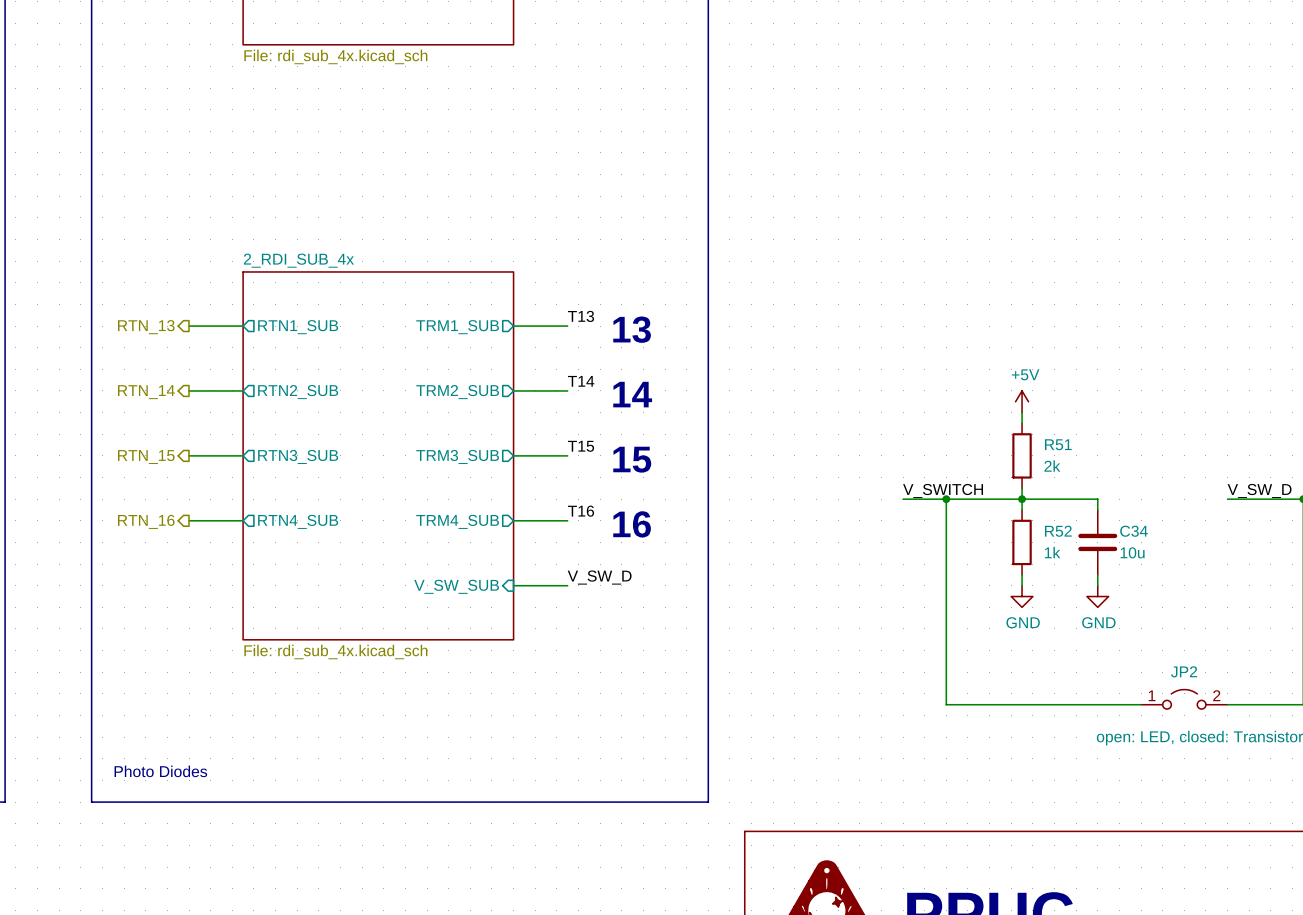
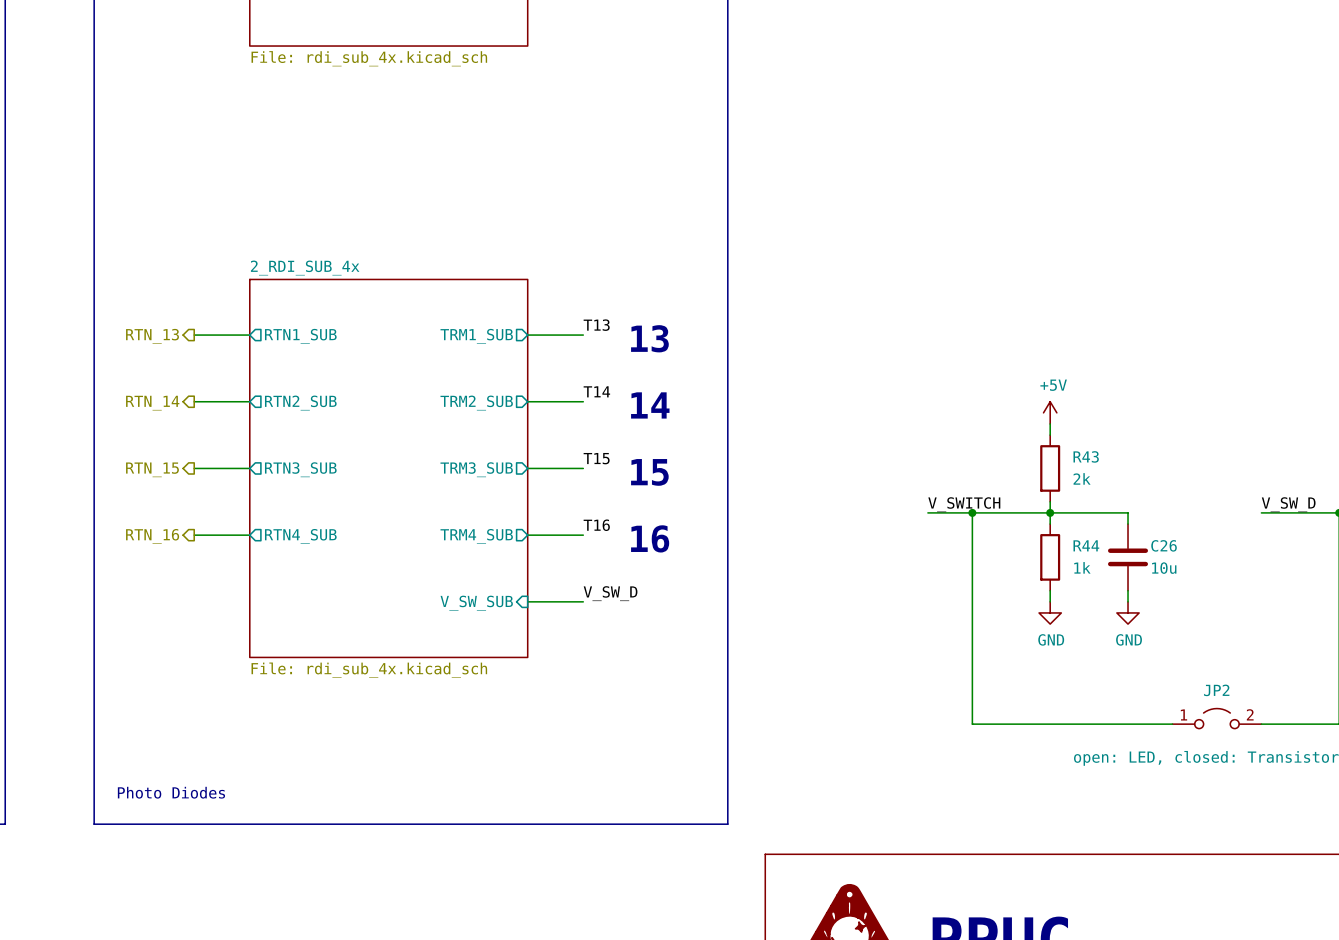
R51 name: R51 (1058, 444) -> R43 (1086, 456)
R52 name: R52 (1058, 531) -> R44 (1086, 545)
C34 name: C34 (1133, 531) -> C26 (1164, 545)

